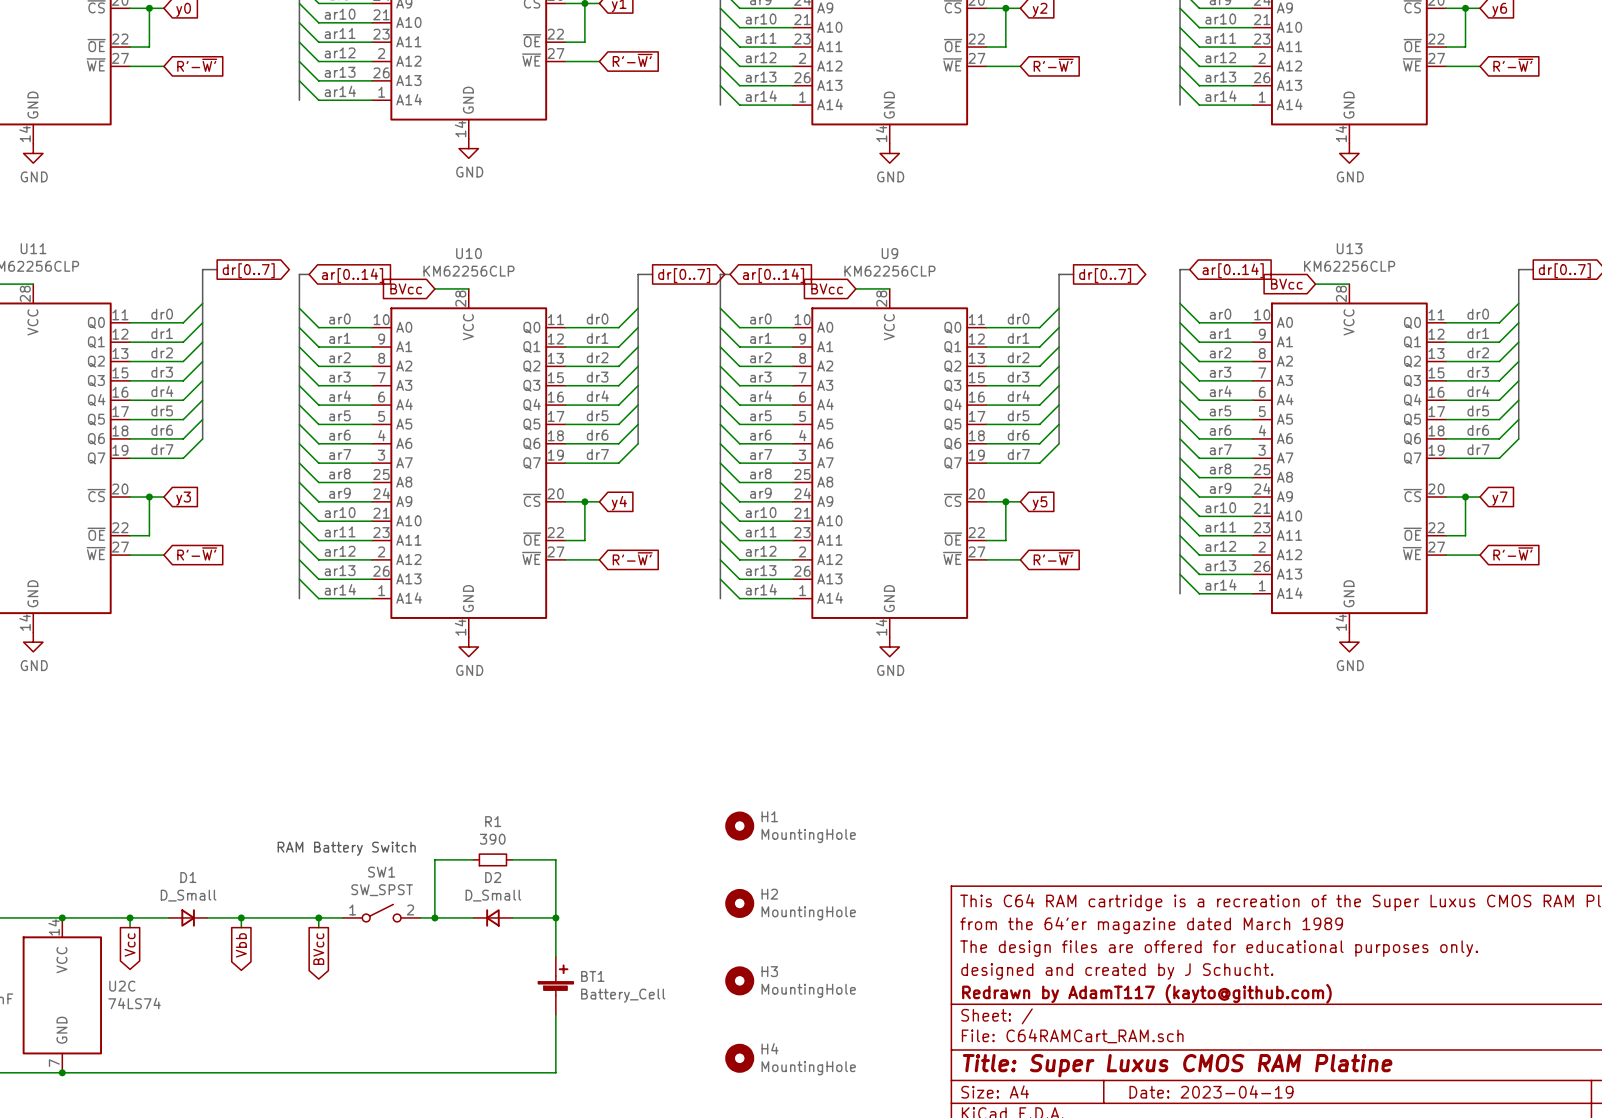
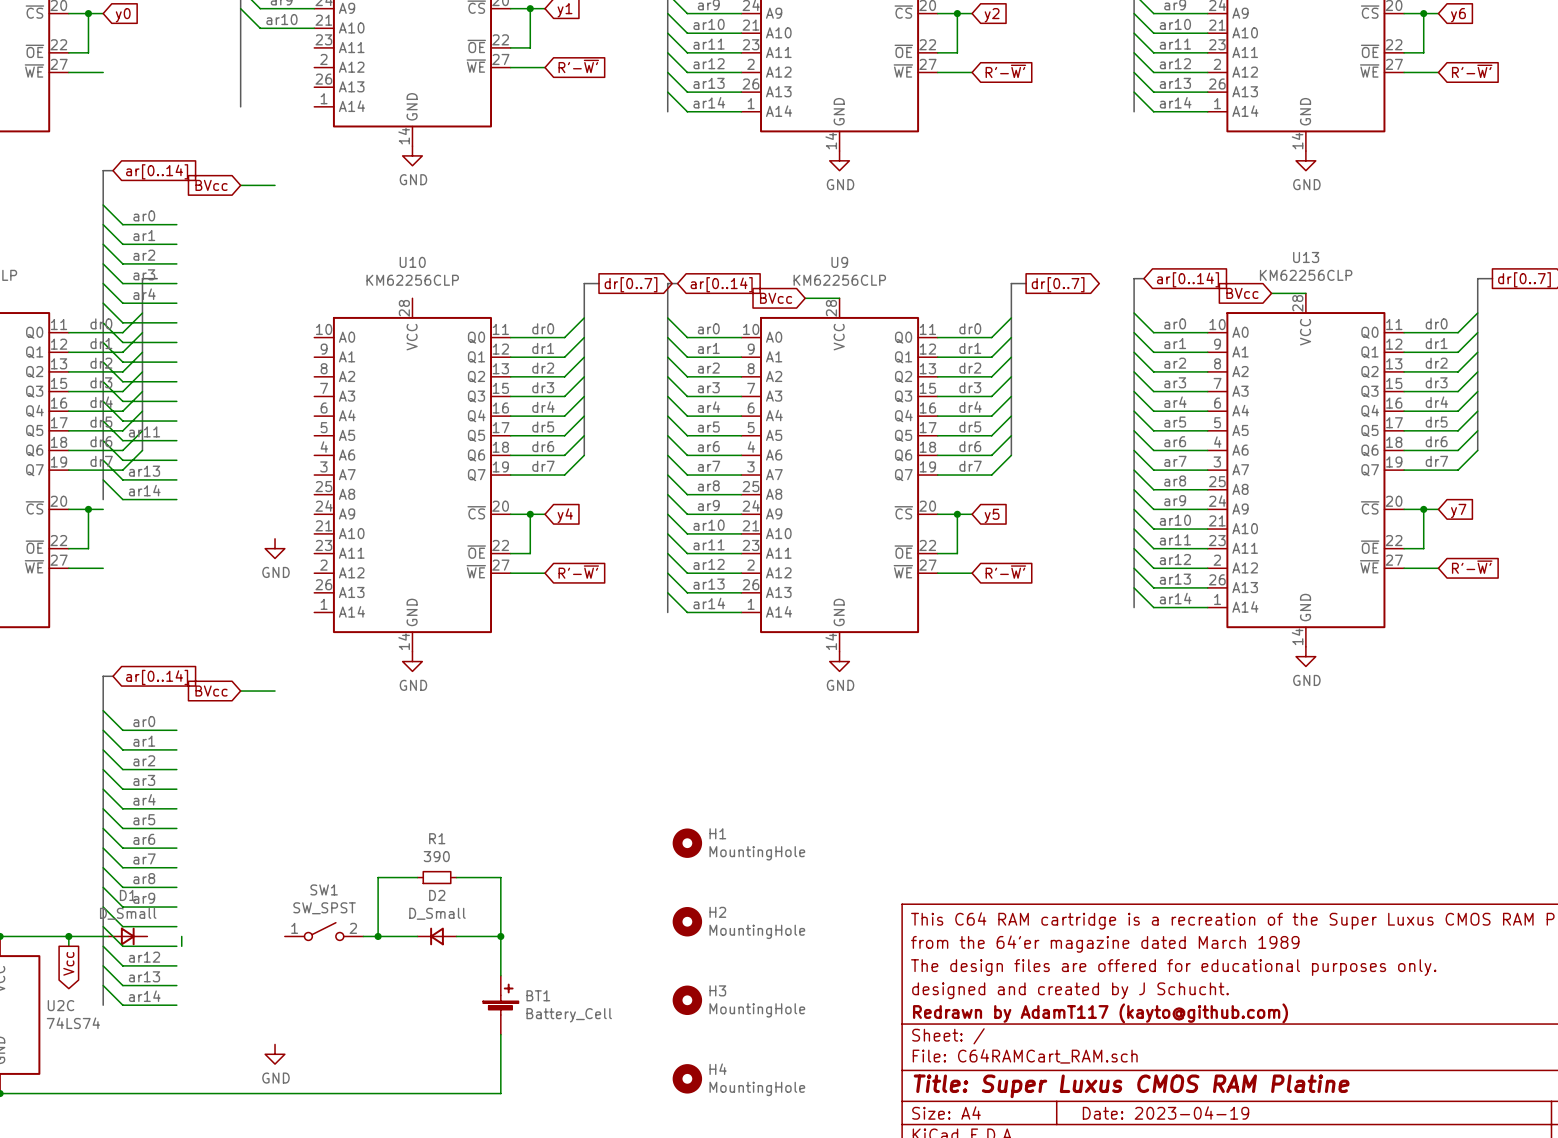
wire: (299, 22) (318, 42) (371, 42) -> none
label: ar11 (340, 33) -> none
wire: (299, 42) (318, 61) (371, 61) -> none
label: ar12 (340, 52) -> none
wire: (299, 61) (318, 80) (371, 80) -> none
global label: R'-~{W'} (197, 65) -> none
label: ar13 (340, 72) -> none
wire: (299, 80) (318, 100) (371, 100) -> none
label: ar14 (340, 91) -> none
label: none -> ar0 (144, 215)
label: none -> ar1 (144, 235)
label: none -> ar2 (144, 255)
label: none -> ar3 (144, 274)
global label: dr[0..7] (248, 270) -> none
bus: (309, 274) (299, 274) (299, 598) -> (113, 170) (103, 170) (103, 499)
global label position: ar[0..14] (352, 275) -> ar[0..14] (157, 171)
label: none -> ar4 (144, 294)
global label position: BVcc (406, 288) -> BVcc (211, 185)
wire: (434, 288) (468, 288) -> (240, 185) (275, 185)
wire: (299, 308) (318, 327) (371, 327) -> (103, 205) (122, 224) (176, 224)
label: ar0 (339, 319) -> none
wire: (299, 327) (318, 347) (371, 347) -> (103, 224) (122, 244) (176, 244)
label: ar1 (339, 338) -> none
wire: (299, 347) (318, 366) (371, 366) -> (103, 244) (122, 263) (176, 263)
label: ar2 (339, 357) -> none
wire: (299, 366) (318, 385) (371, 385) -> (103, 263) (122, 283) (176, 283)
label: ar3 (339, 377) -> none
wire: (299, 385) (318, 405) (371, 405) -> (103, 283) (122, 303) (176, 303)
label: ar4 (340, 396) -> none
wire: (299, 405) (318, 424) (371, 424) -> (103, 303) (122, 322) (176, 322)
label: ar5 (339, 415) -> none
label: none -> ar11 (144, 431)
wire: (299, 424) (318, 443) (371, 443) -> (103, 322) (122, 342) (176, 342)
label: ar6 (339, 435) -> none
wire: (299, 443) (318, 463) (371, 463) -> (103, 342) (122, 362) (176, 362)
label: ar7 (340, 454) -> none
label: none -> ar13 (144, 471)
wire: (299, 463) (318, 482) (371, 482) -> (103, 362) (122, 381) (176, 381)
label: ar8 (339, 473) -> none
label: none -> ar14 (144, 490)
wire: (299, 482) (318, 501) (371, 501) -> (103, 381) (122, 401) (176, 401)
label: ar9 (339, 493) -> none
global label: y3 (183, 498) -> none
wire: (299, 501) (318, 521) (371, 521) -> (103, 401) (122, 421) (176, 421)
label: ar10 (340, 512) -> none
wire: (299, 521) (318, 540) (371, 540) -> (103, 421) (122, 440) (176, 440)
label: ar11 (340, 531) -> none
power symbol: none -> GND (275, 548)
wire: (299, 540) (318, 559) (371, 559) -> (103, 440) (122, 460) (176, 460)
label: ar12 (340, 551) -> none
global label: R'-~{W'} (197, 553) -> none
wire: (299, 559) (318, 579) (371, 579) -> (103, 460) (122, 479) (176, 479)
label: ar13 (340, 570) -> none
wire: (299, 579) (318, 598) (371, 598) -> (103, 479) (122, 499) (176, 499)
label: ar14 (340, 589) -> none
bus: none -> (113, 676) (103, 676) (103, 1005)
global label: none -> ar[0..14] (157, 677)
global label: none -> BVcc (211, 691)
wire: none -> (240, 691) (275, 691)
wire: none -> (103, 710) (122, 730) (176, 730)
label: none -> ar0 (144, 721)
wire: none -> (103, 730) (122, 749) (176, 749)
label: none -> ar1 (144, 741)
wire: none -> (103, 749) (122, 769) (176, 769)
label: none -> ar2 (144, 760)
wire: none -> (103, 769) (122, 789) (176, 789)
label: none -> ar3 (144, 780)
wire: none -> (103, 789) (122, 808) (176, 808)
label: none -> ar4 (144, 799)
wire: none -> (103, 808) (122, 828) (176, 828)
label: none -> ar5 (144, 819)
wire: none -> (103, 828) (122, 848) (176, 848)
label: none -> ar6 (144, 839)
wire: none -> (103, 848) (122, 867) (176, 867)
label: none -> ar7 (144, 858)
text: RAM Battery Switch (346, 848) -> none
wire: none -> (103, 867) (122, 887) (176, 887)
label: none -> ar8 (144, 878)
wire: none -> (103, 887) (122, 907) (176, 907)
label: none -> ar9 (144, 898)
wire: none -> (103, 907) (122, 926) (176, 926)
wire: none -> (103, 926) (122, 946) (176, 946)
wire: (207, 917) (342, 917) -> none
junction: (241, 917) -> none
wire: (318, 917) (318, 927) -> none
junction: (318, 917) -> none
wire: none -> (103, 946) (122, 965) (176, 965)
label: none -> ar12 (144, 957)
global label: Vbb (241, 945) -> none
wire: none -> (103, 965) (122, 985) (176, 985)
global label: BVcc (318, 949) -> none
label: none -> ar13 (144, 976)
wire: none -> (103, 985) (122, 1005) (176, 1005)
label: none -> ar14 (144, 996)
power symbol: none -> GND (275, 1054)

